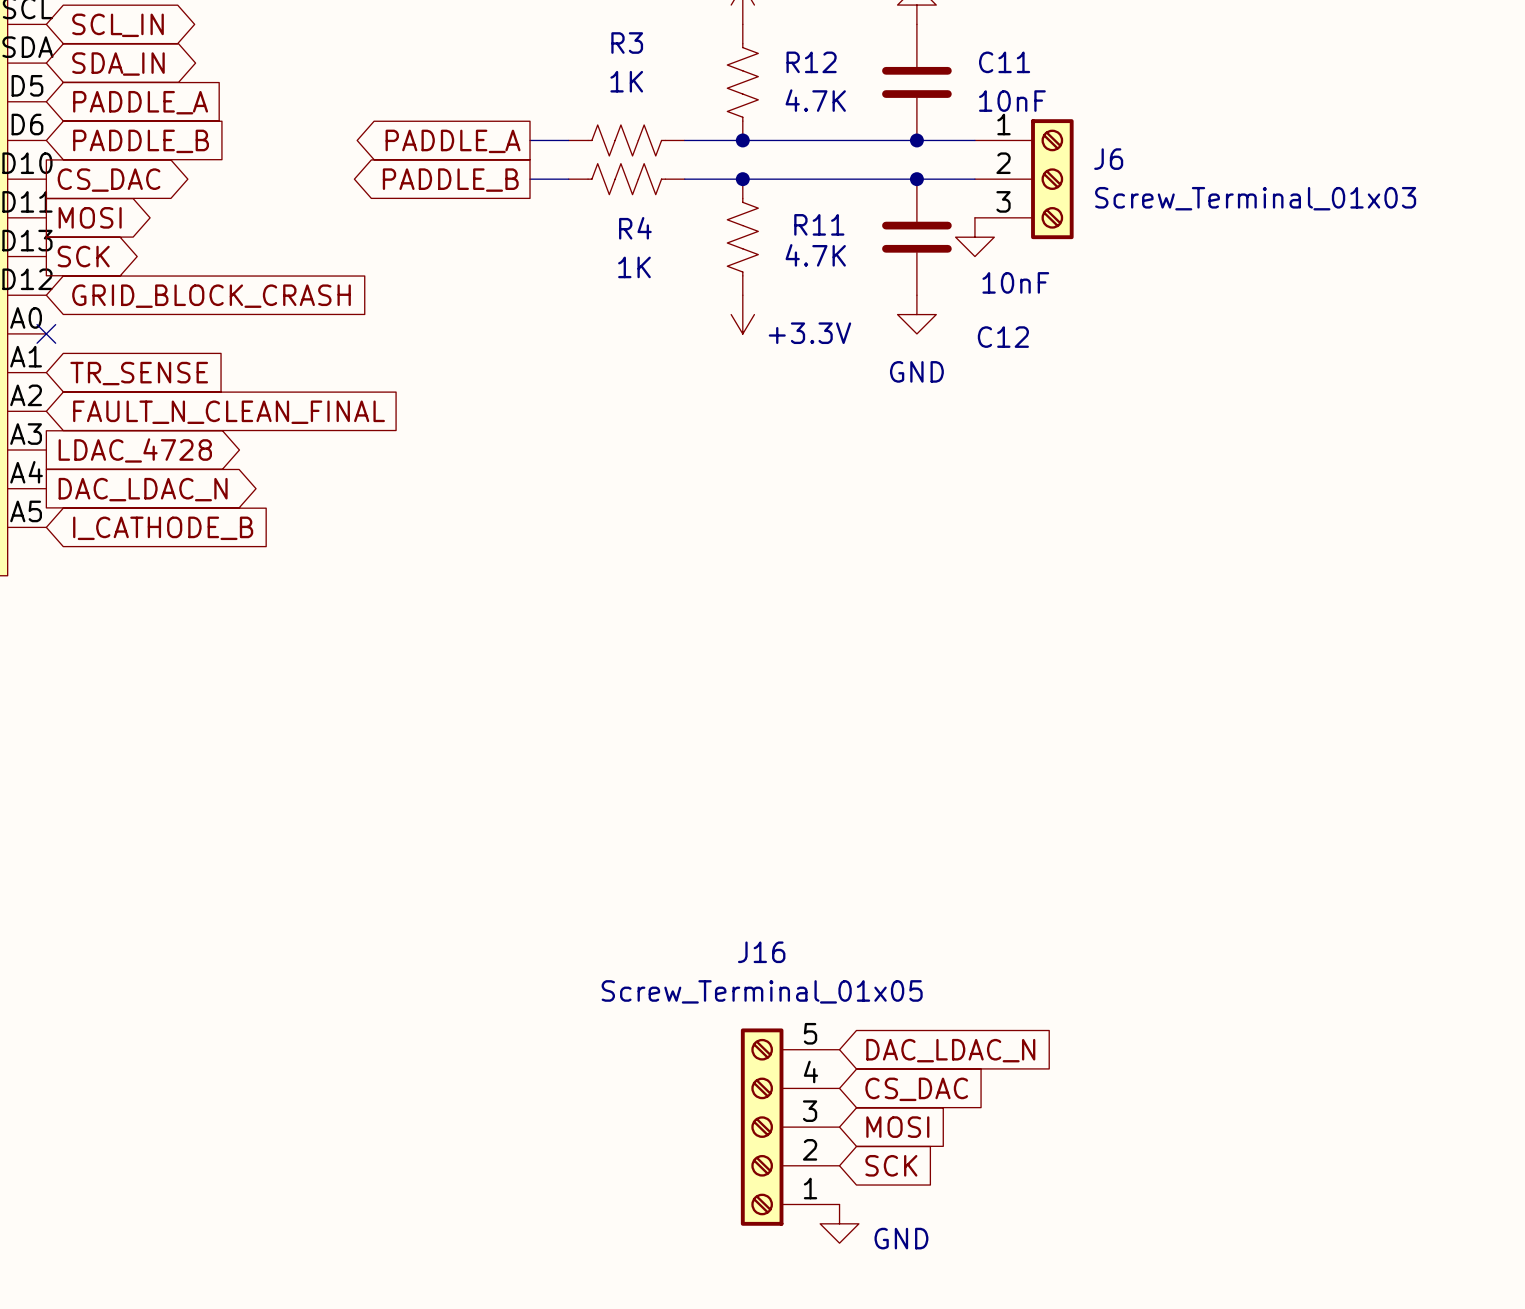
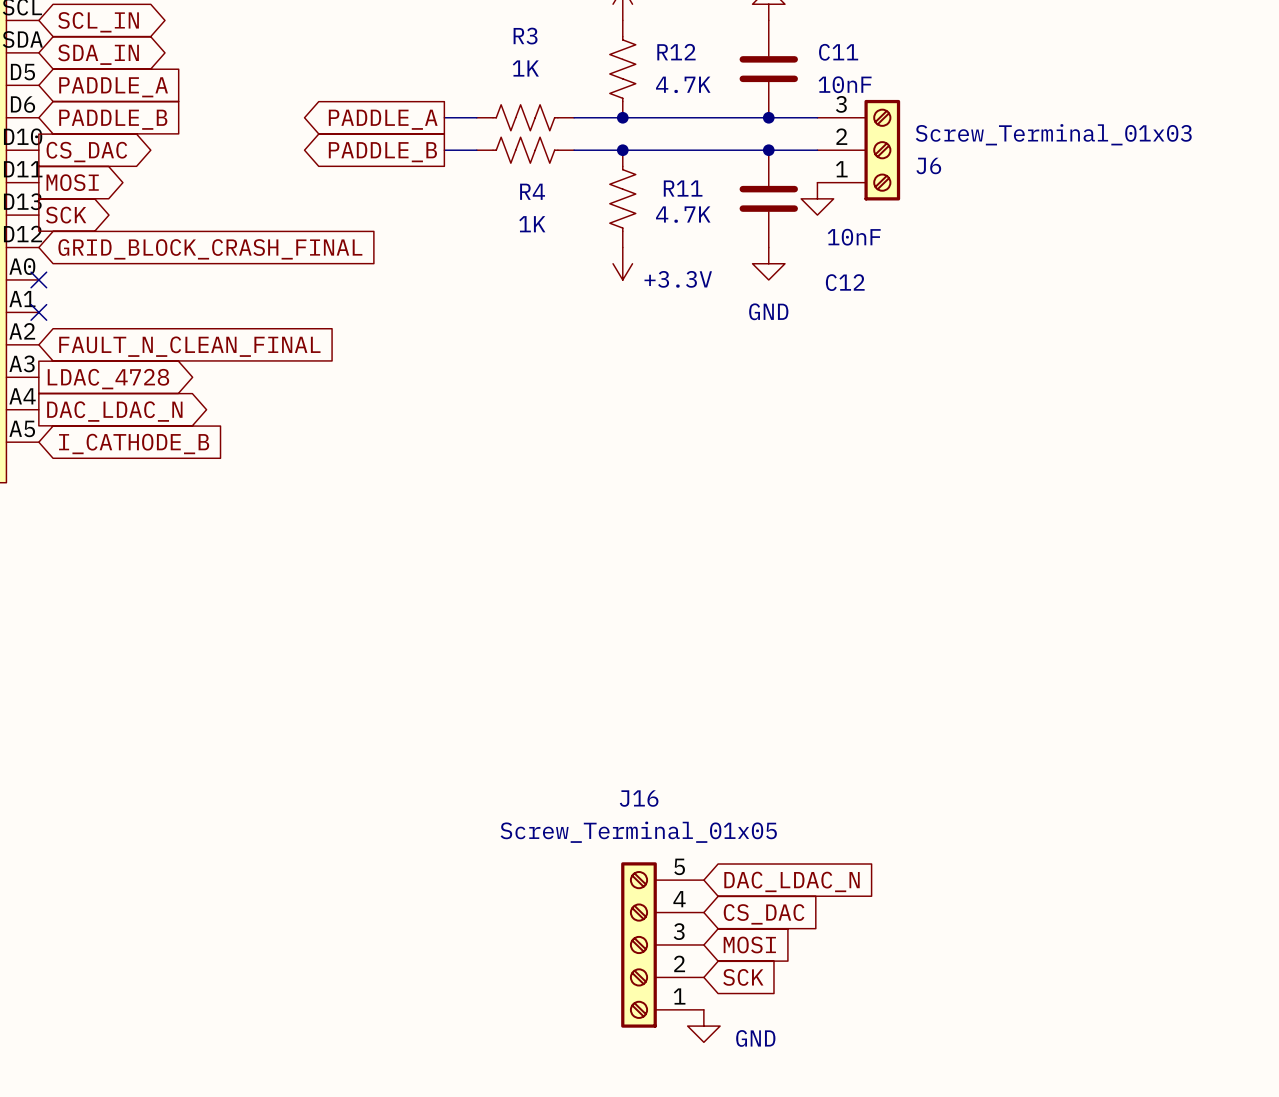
J6 flip: as is (1052, 179) -> up-down (882, 150)
global label: GRID_BLOCK_CRASH (211, 296) -> GRID_BLOCK_CRASH_FINAL (210, 249)
no-connect mark: none -> (38, 312)
global label: TR_SENSE (139, 373) -> none

